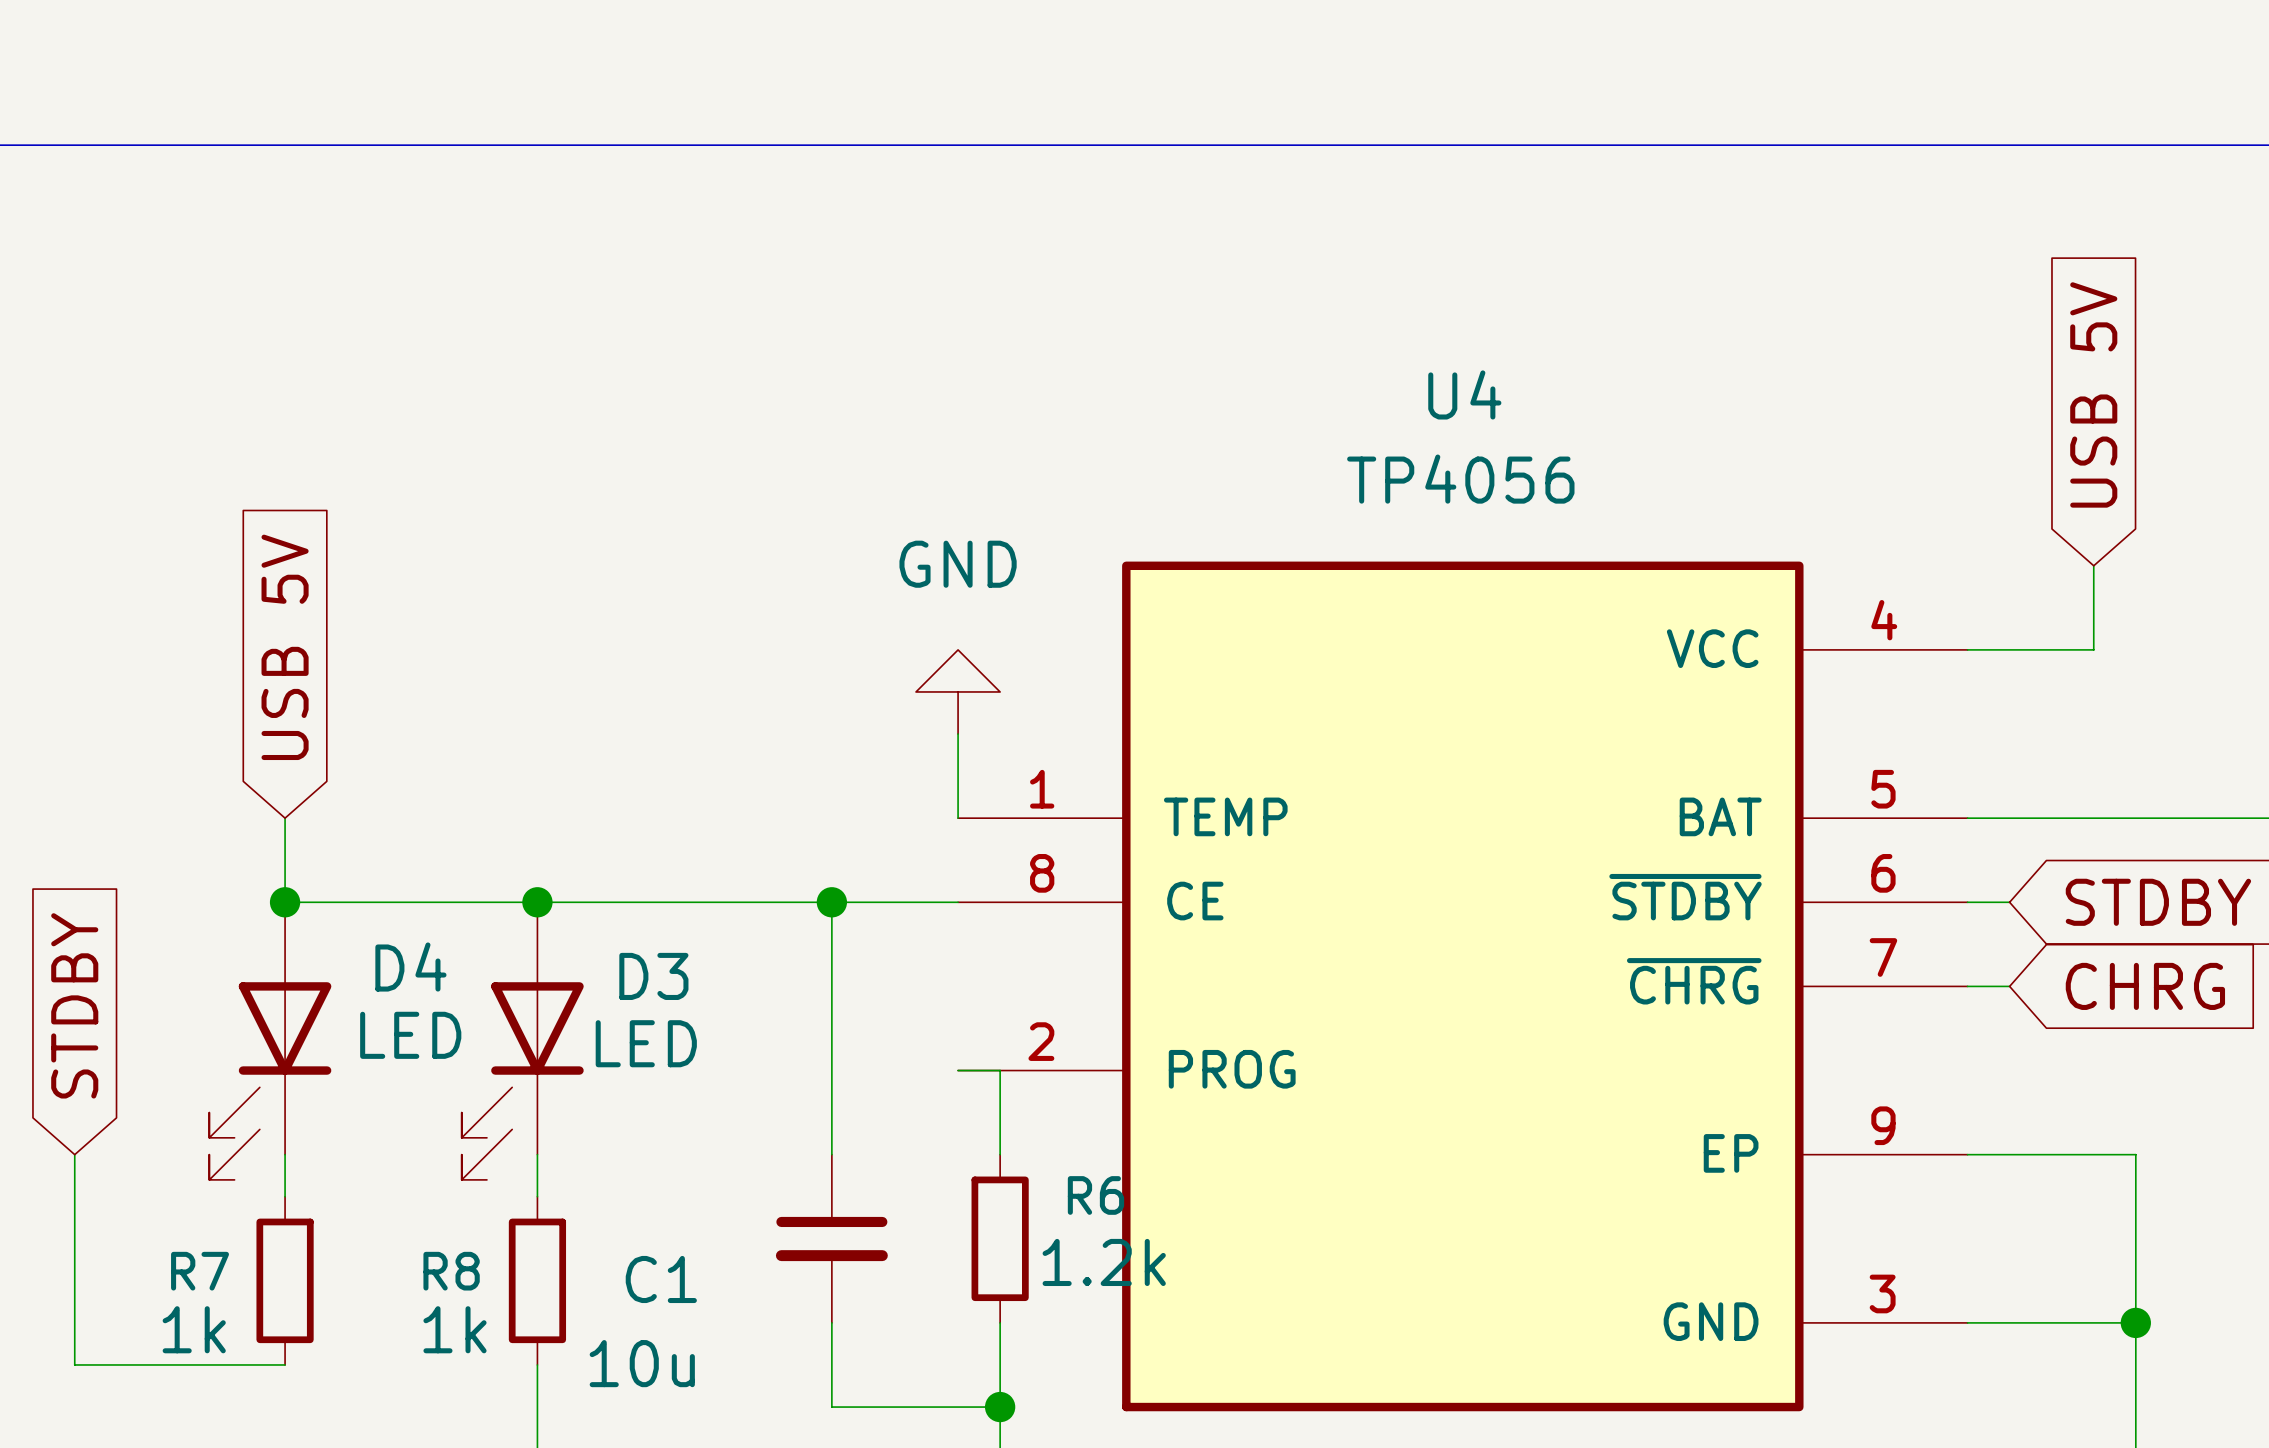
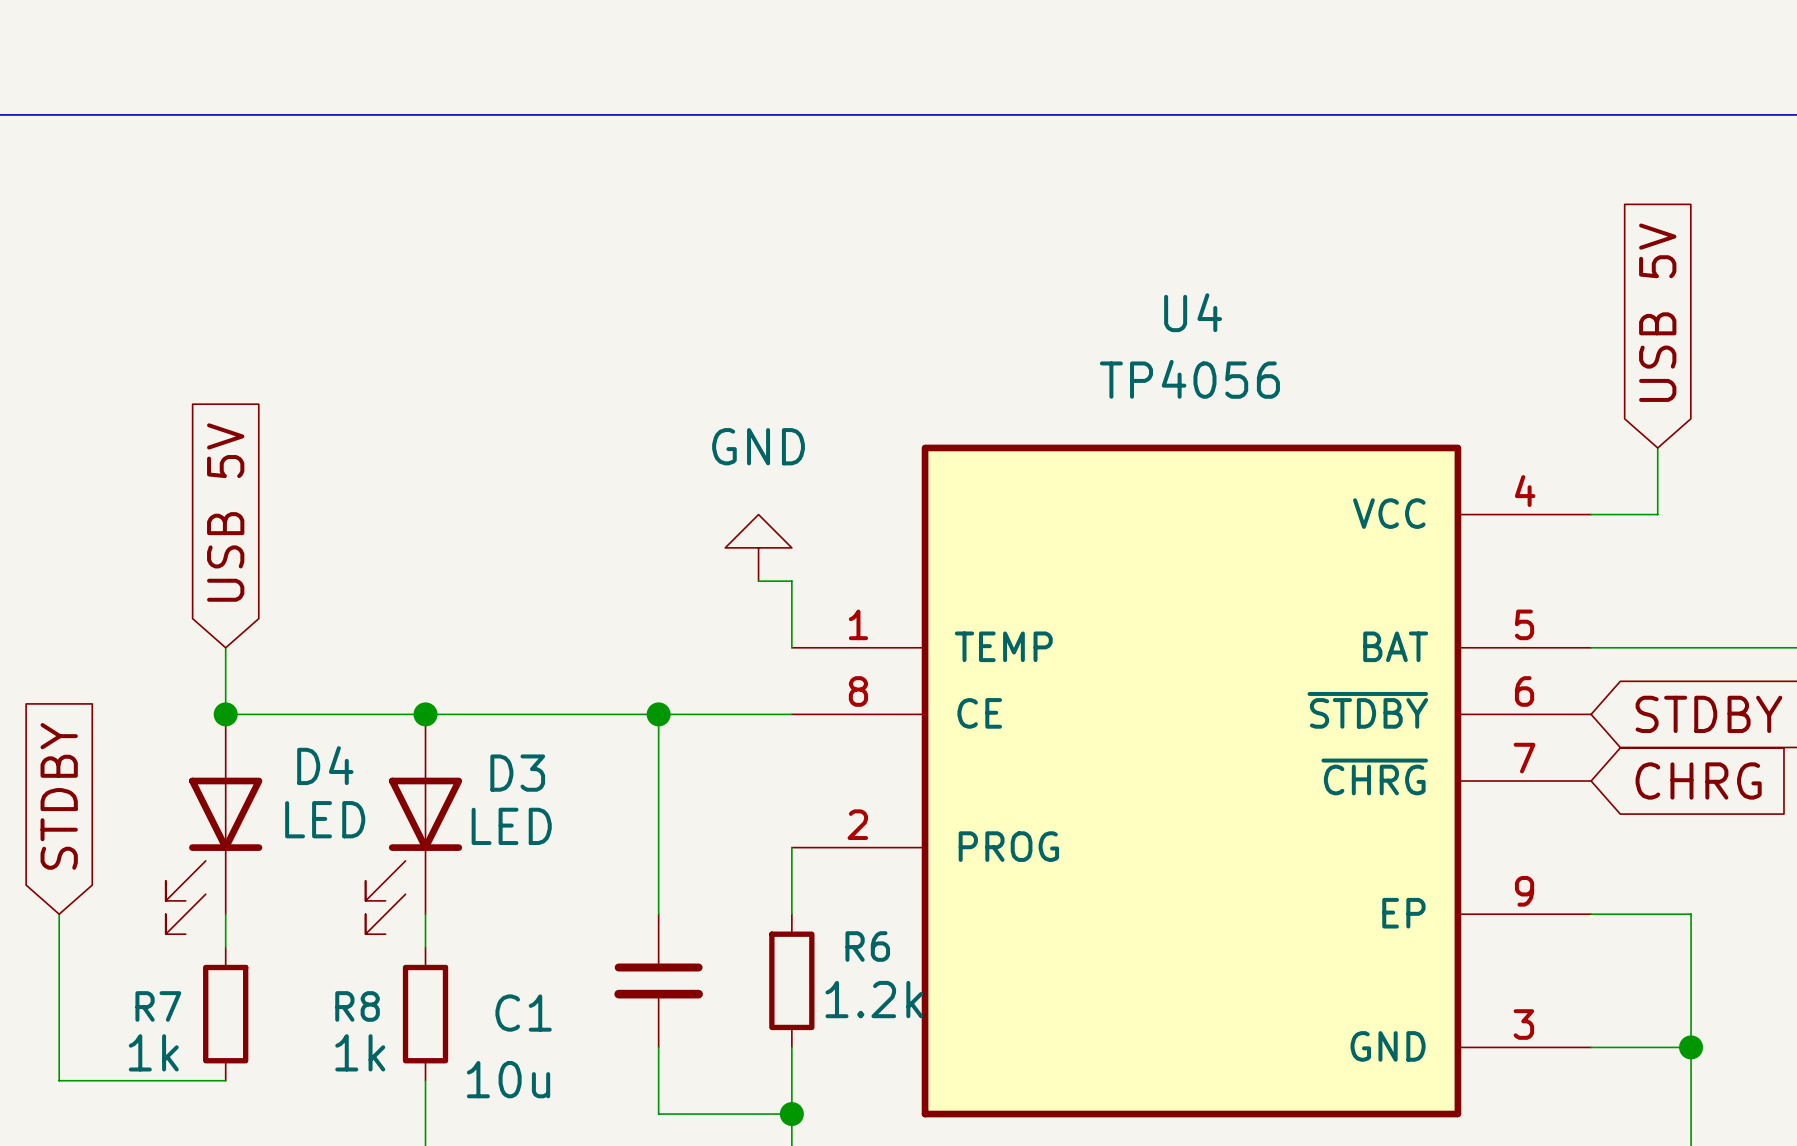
wire: (958, 734) (958, 818) -> (758, 581) (791, 581) (791, 647)
U4 position: (1462, 986) -> (1191, 781)

